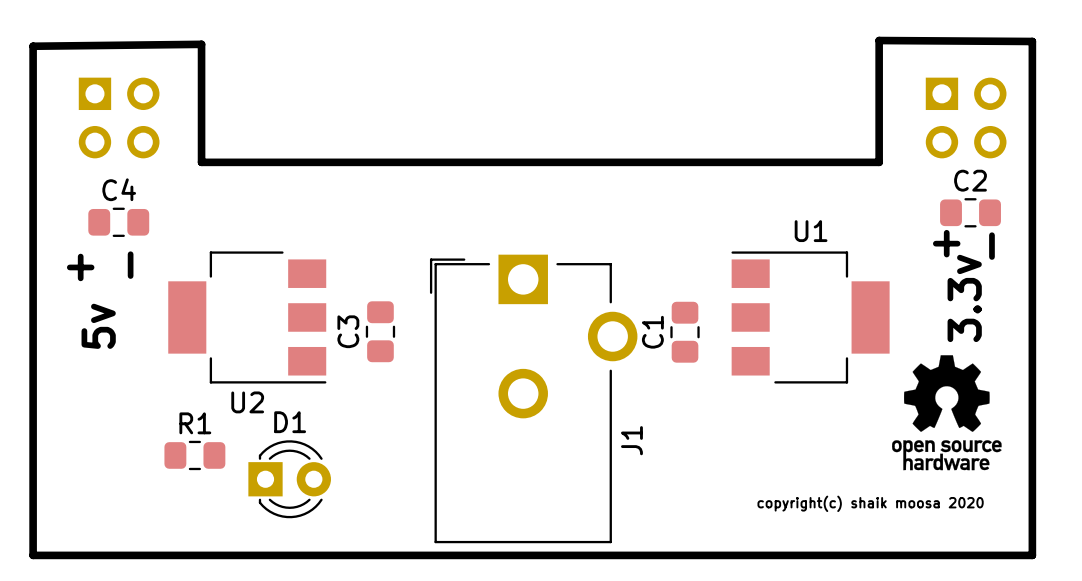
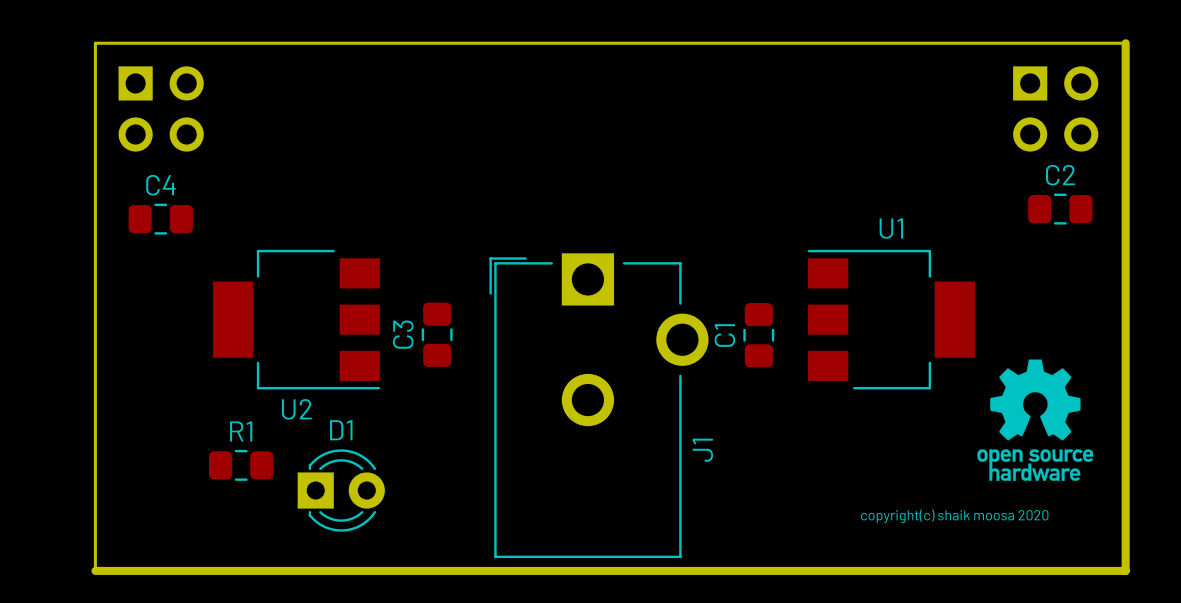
board edge: (1032, 55) (1032, 41) (879, 40) (879, 162) (201, 162) (201, 44) (33, 46) (33, 555) (56, 555) -> (1125, 43) (95, 43) (95, 570)
text: + (946, 243) -> none
text: - (991, 246) -> none
text: - (130, 265) -> none
text: + (80, 267) -> none
text: 3.3v (964, 298) -> none
text: 5v (98, 326) -> none

